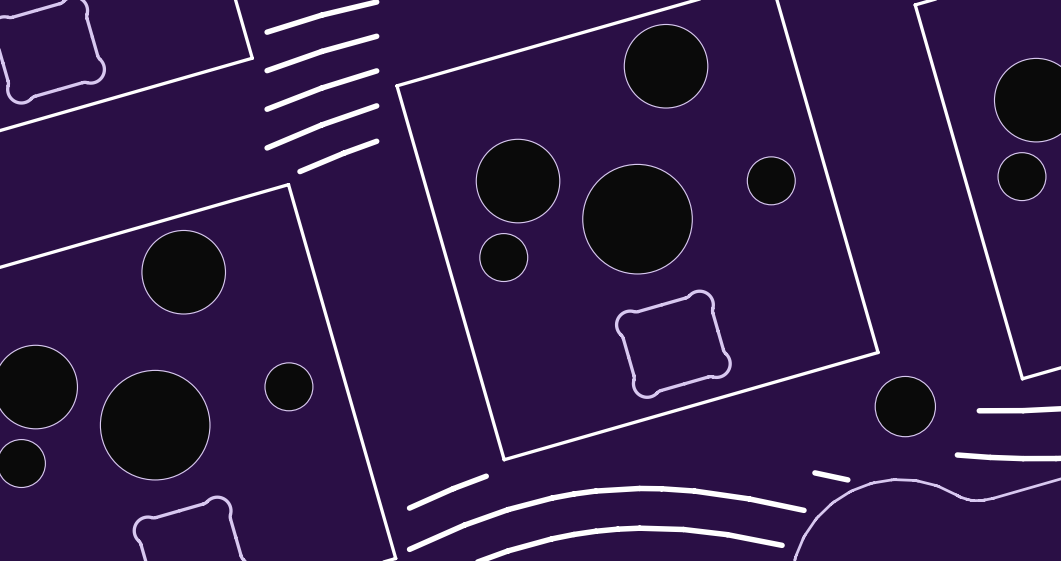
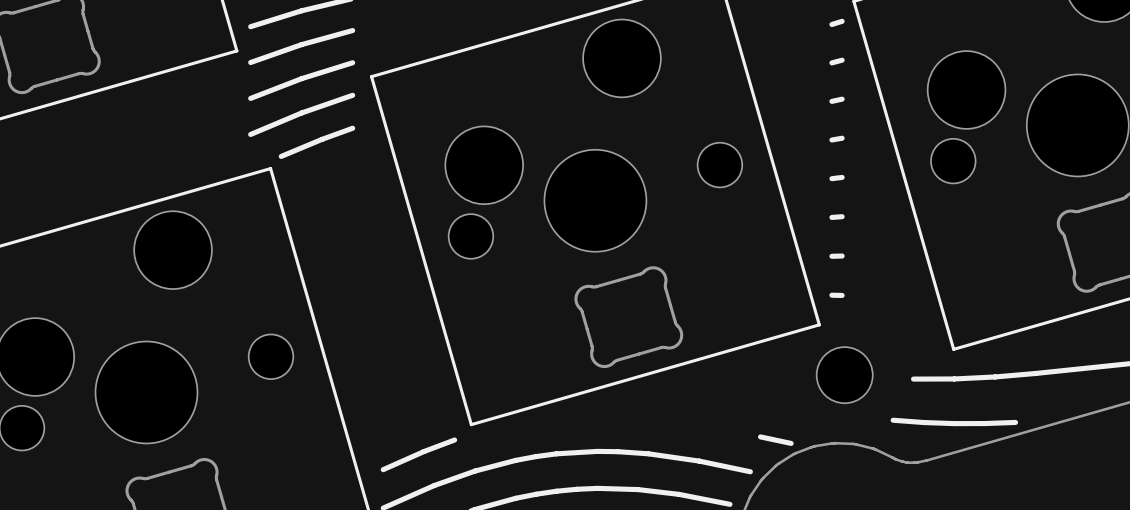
line: none -> (842, 21) (831, 24)
line: none -> (842, 60) (831, 62)
line: none -> (842, 99) (831, 101)
line: none -> (842, 138) (831, 139)
line: none -> (842, 177) (831, 178)
line: none -> (842, 216) (831, 217)
line: none -> (842, 256) (831, 256)
line: none -> (831, 295) (842, 295)

